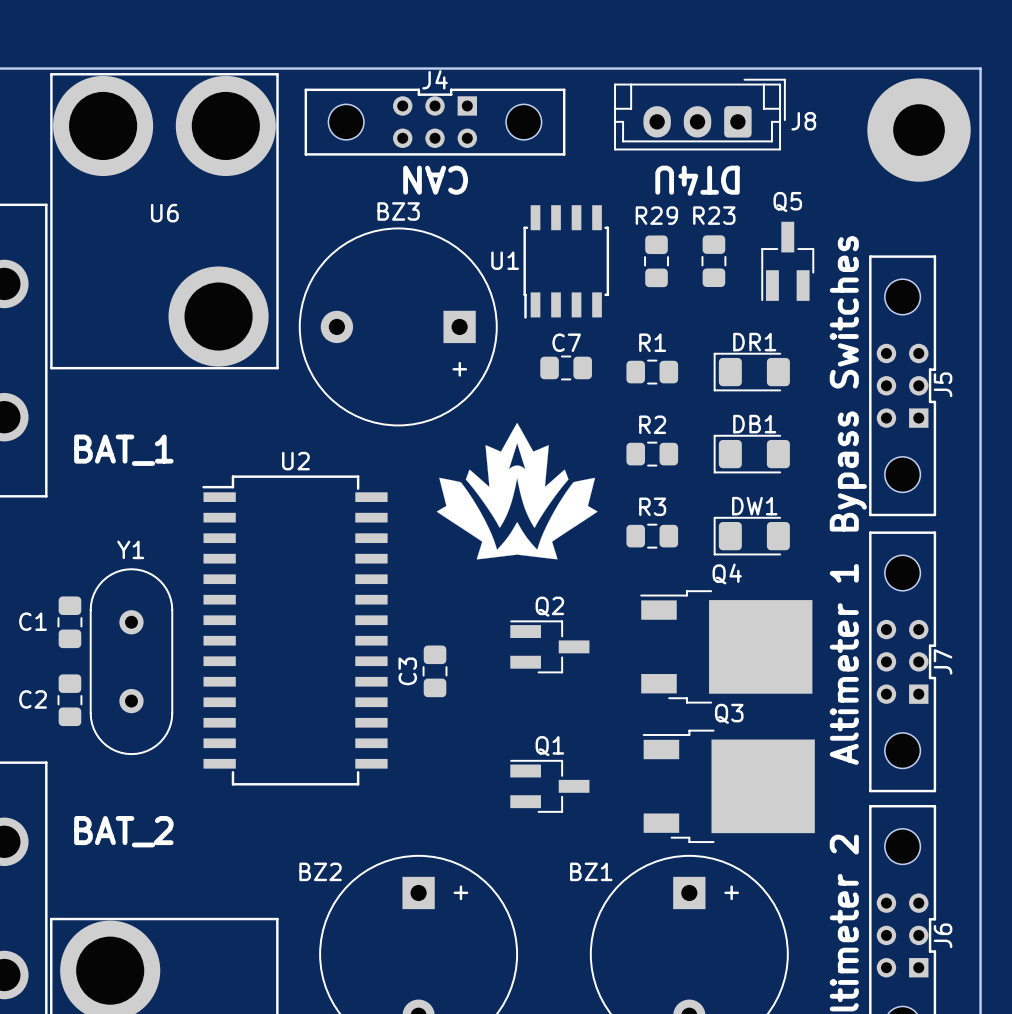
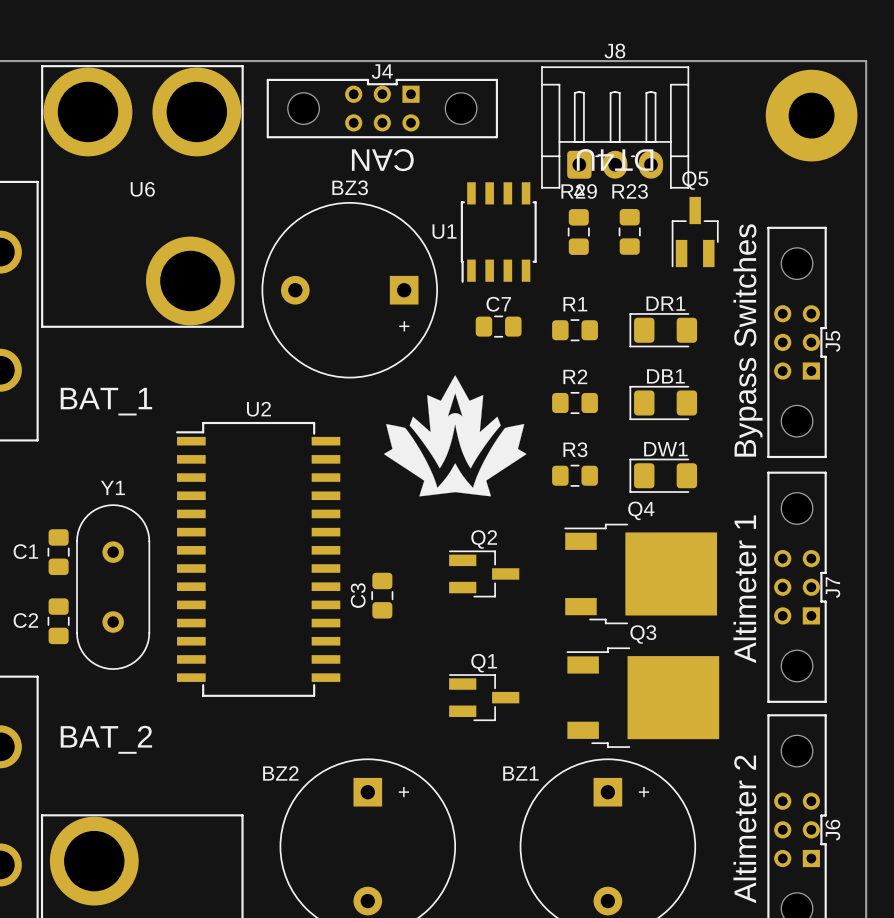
J8 footprint: [614, 78, 786, 151] -> [541, 66, 690, 196]
J8 name position: J8 (803, 121) -> J8 (614, 51)

